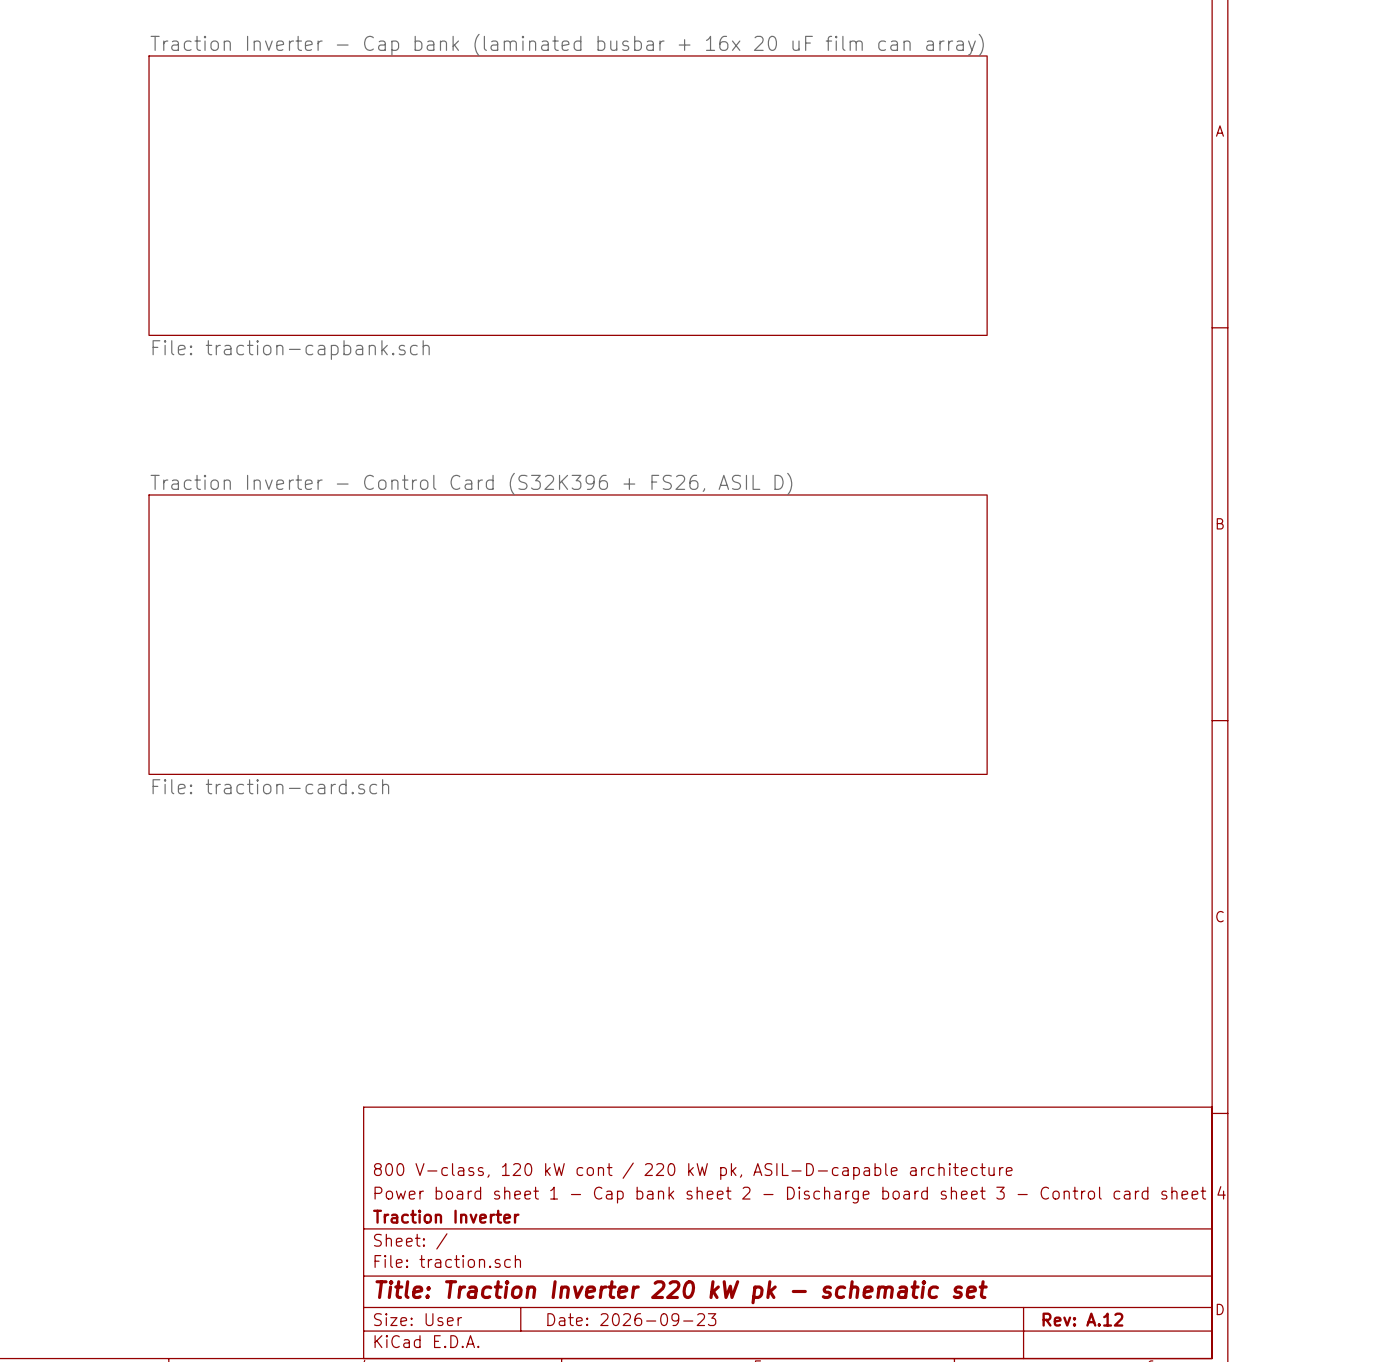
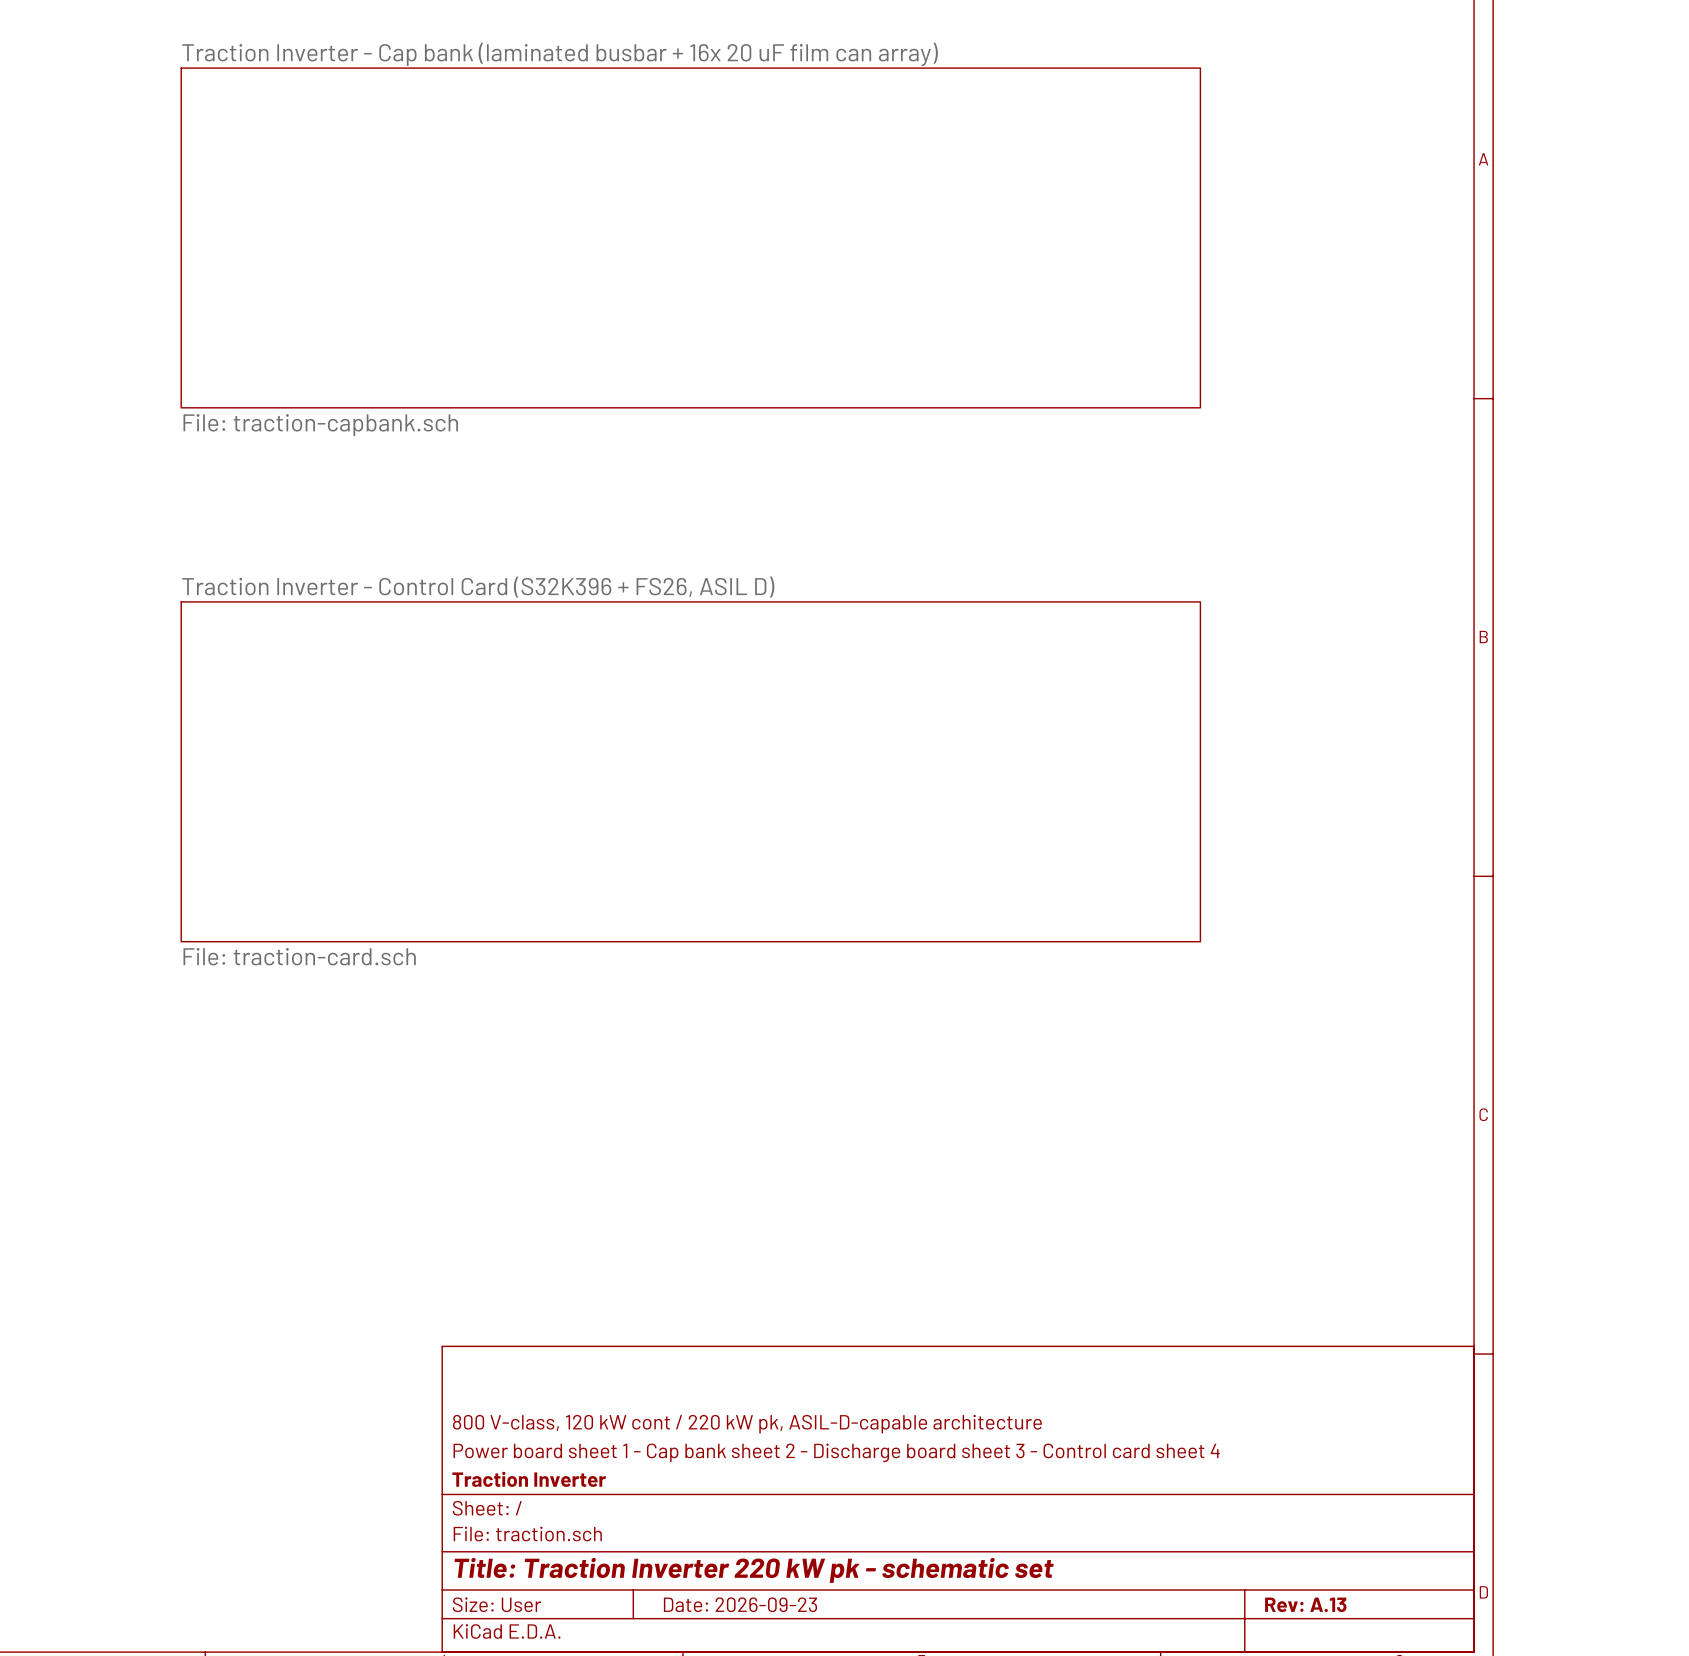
title block: Rev: A.12 (1082, 1319) -> Rev: A.13 (1305, 1604)

